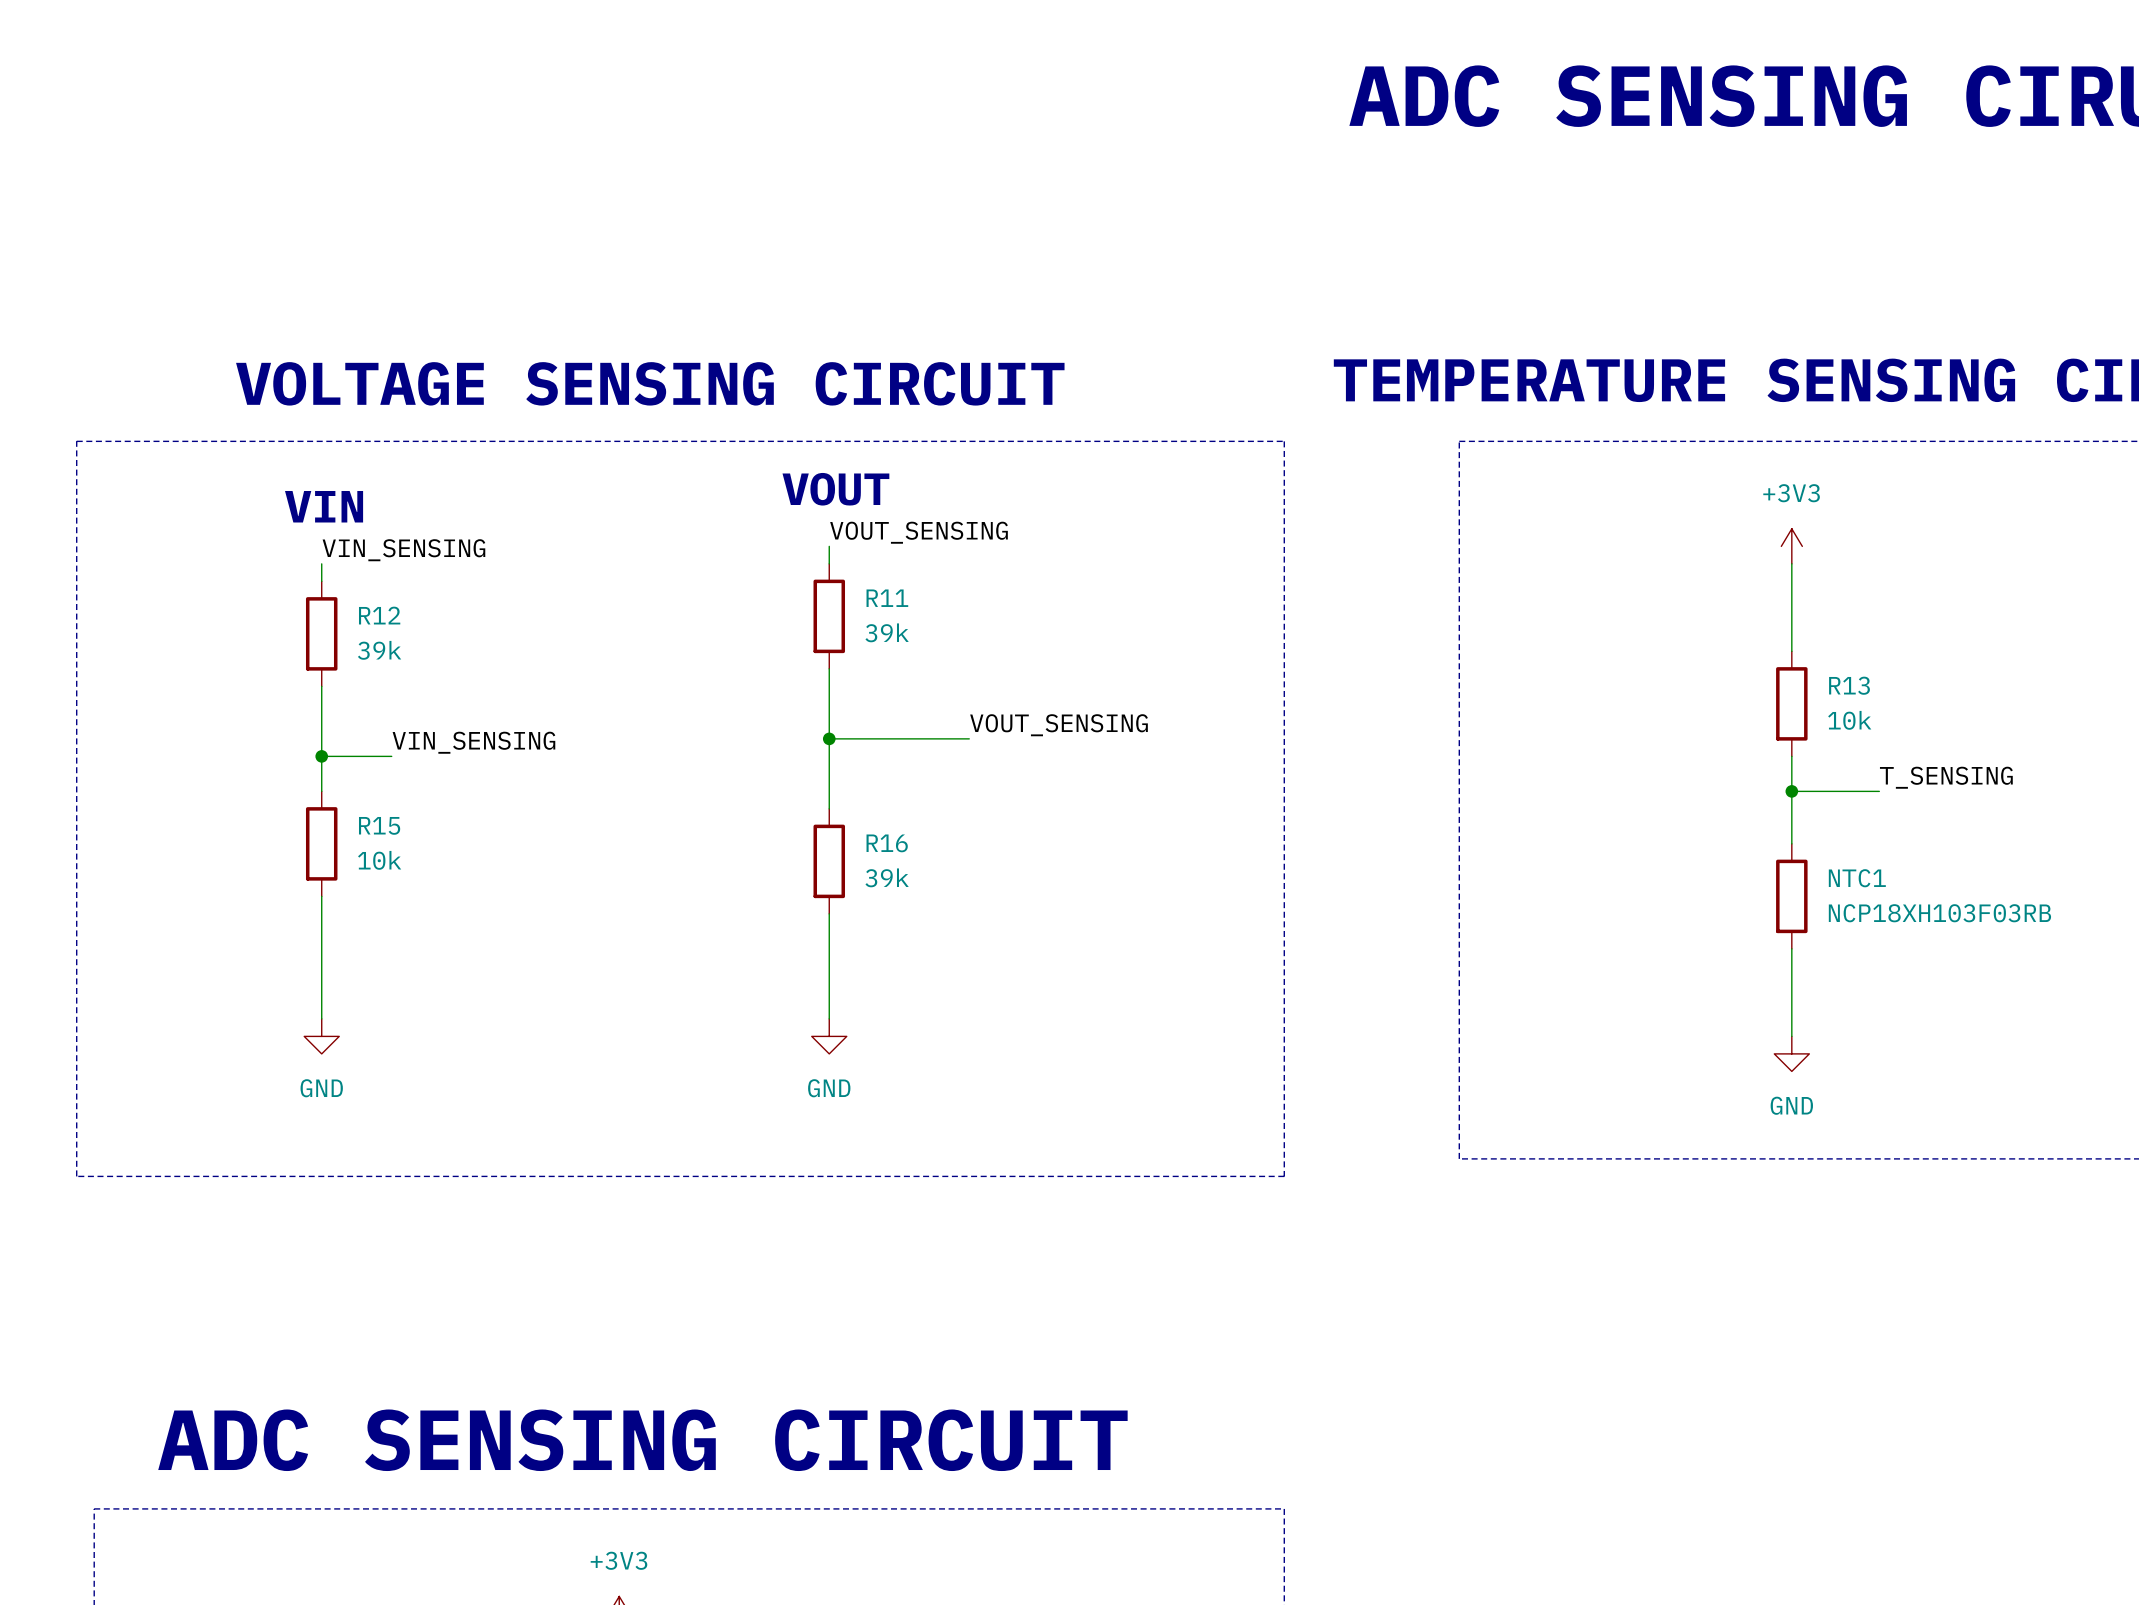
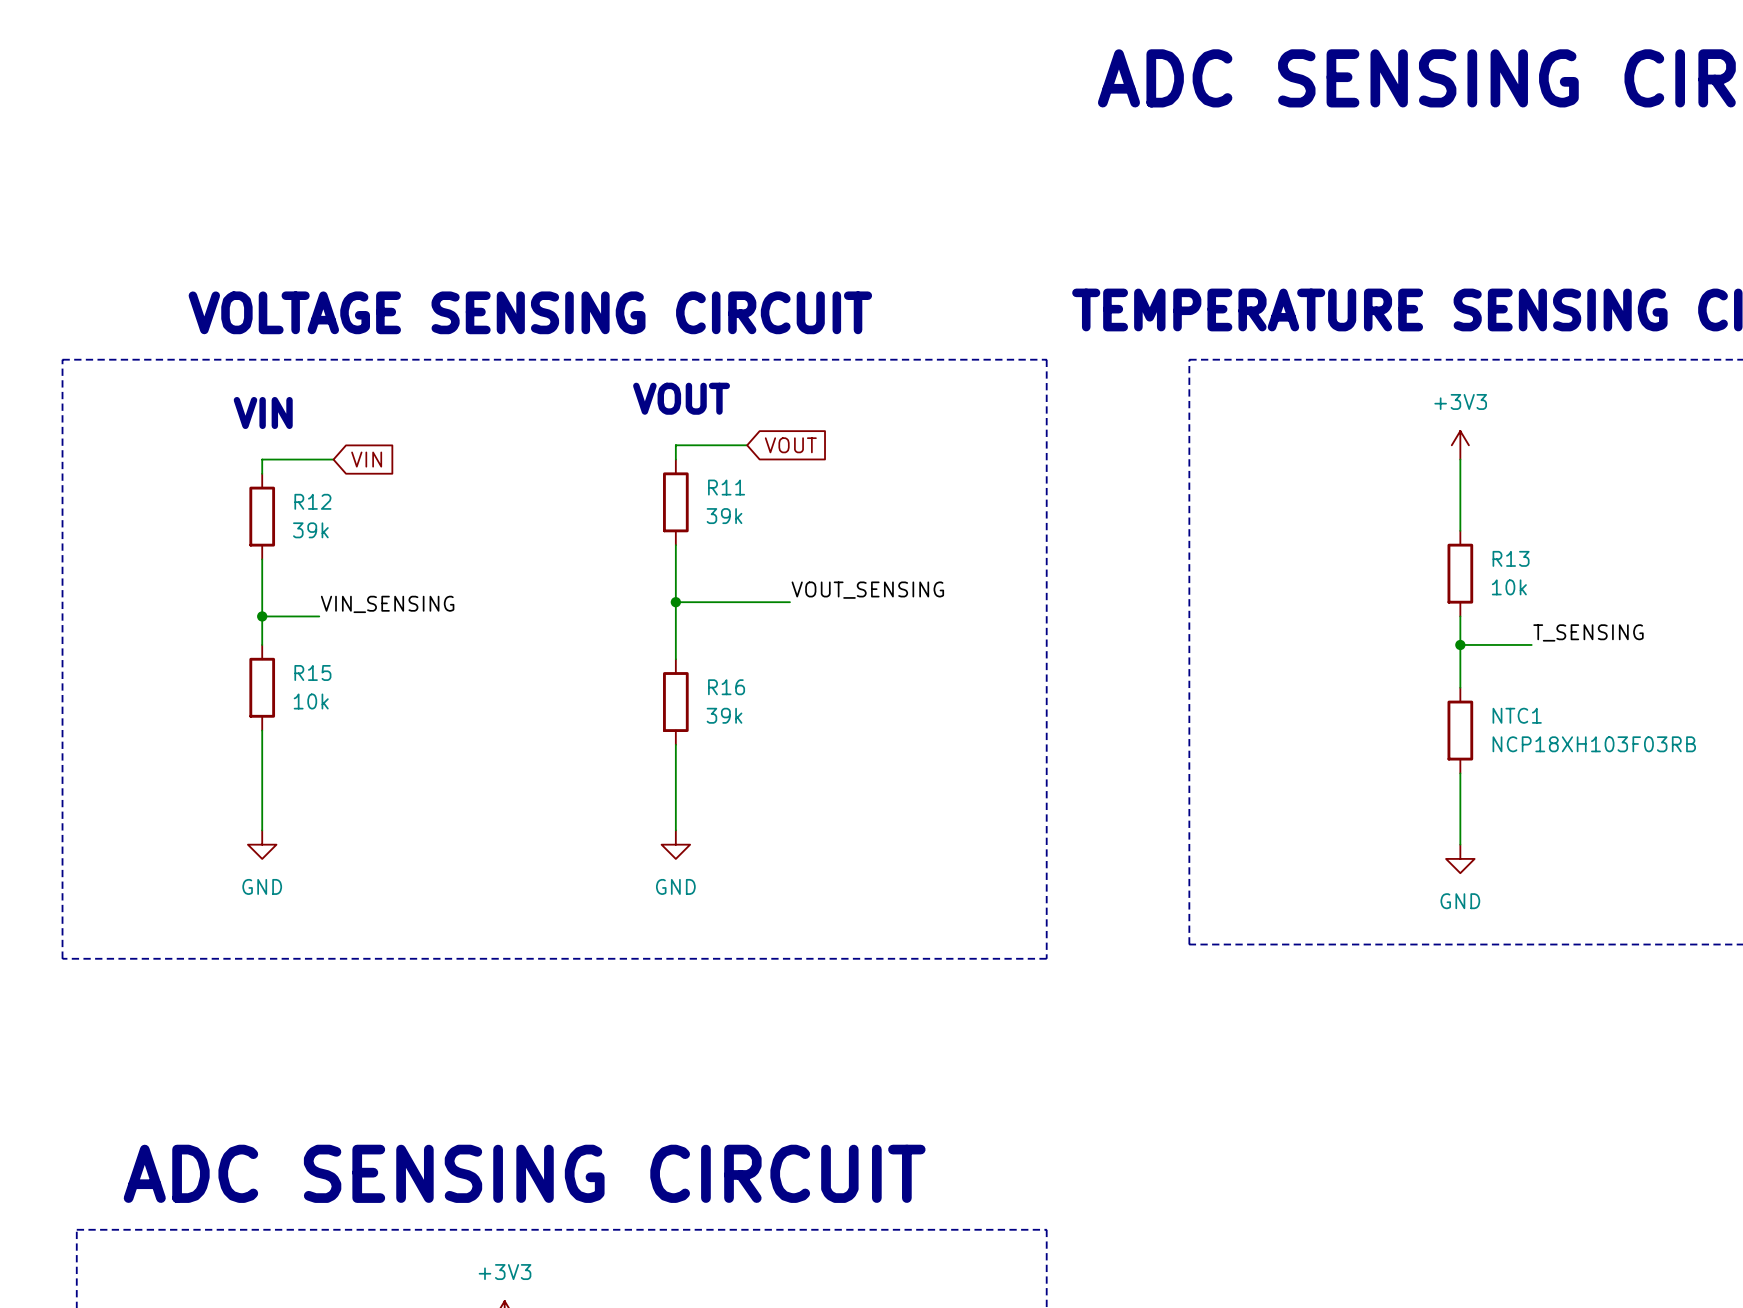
label: VOUT_SENSING (919, 532) -> none
wire: none -> (675, 445) (747, 445)
global label: none -> VOUT (790, 445)
label: VIN_SENSING (403, 550) -> none
wire: none -> (262, 459) (333, 459)
global label: none -> VIN (366, 459)

